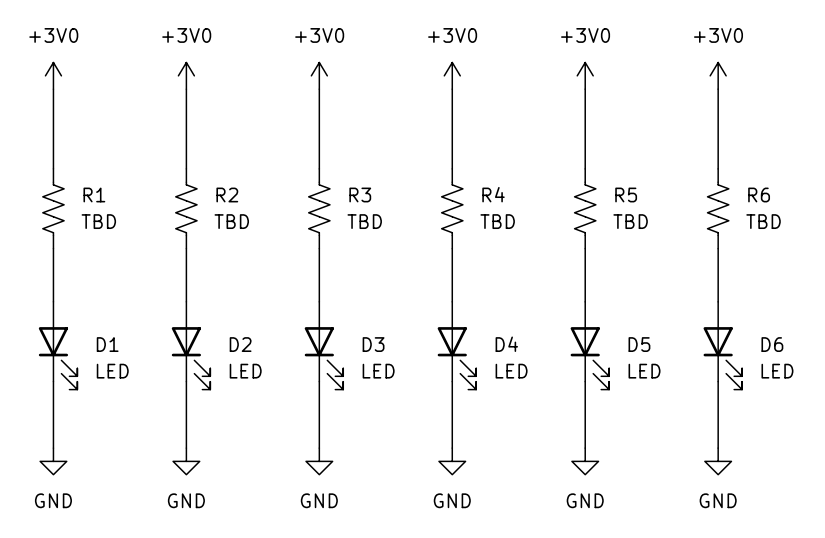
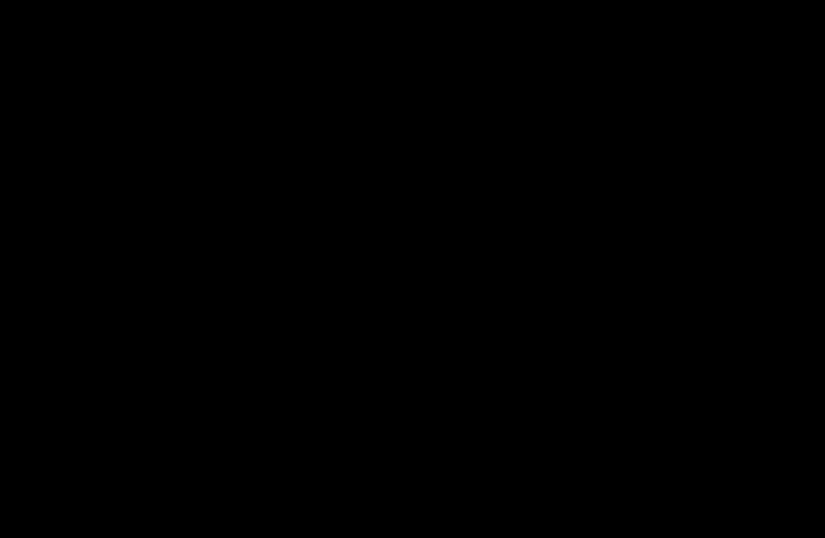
power symbol: +3V0 (53, 75) -> none
power symbol: +3V0 (186, 75) -> none
power symbol: +3V0 (319, 75) -> none
power symbol: +3V0 (452, 75) -> none
power symbol: +3V0 (585, 75) -> none
power symbol: +3V0 (718, 75) -> none
wire: (53, 89) (53, 168) -> none
wire: (186, 89) (186, 168) -> none
wire: (319, 89) (319, 168) -> none
wire: (452, 89) (452, 168) -> none
wire: (585, 89) (585, 168) -> none
wire: (718, 89) (718, 168) -> none
R1: TBD (53, 208) -> none
R2: TBD (186, 208) -> none
R3: TBD (319, 208) -> none
R4: TBD (452, 208) -> none
R5: TBD (585, 208) -> none
R6: TBD (718, 208) -> none
wire: (53, 248) (53, 301) -> none
wire: (186, 248) (186, 301) -> none
wire: (319, 248) (319, 301) -> none
wire: (452, 248) (452, 301) -> none
wire: (585, 248) (585, 301) -> none
wire: (718, 248) (718, 301) -> none
D1: LED (58, 345) -> none
D2: LED (191, 345) -> none
D3: LED (323, 345) -> none
D4: LED (456, 345) -> none
D5: LED (589, 345) -> none
D6: LED (722, 345) -> none
wire: (53, 381) (53, 448) -> none
wire: (186, 381) (186, 448) -> none
wire: (319, 381) (319, 448) -> none
wire: (452, 381) (452, 448) -> none
wire: (585, 381) (585, 448) -> none
wire: (718, 381) (718, 448) -> none
power symbol: GND (53, 461) -> none
power symbol: GND (186, 461) -> none
power symbol: GND (319, 461) -> none
power symbol: GND (452, 461) -> none
power symbol: GND (585, 461) -> none
power symbol: GND (718, 461) -> none

